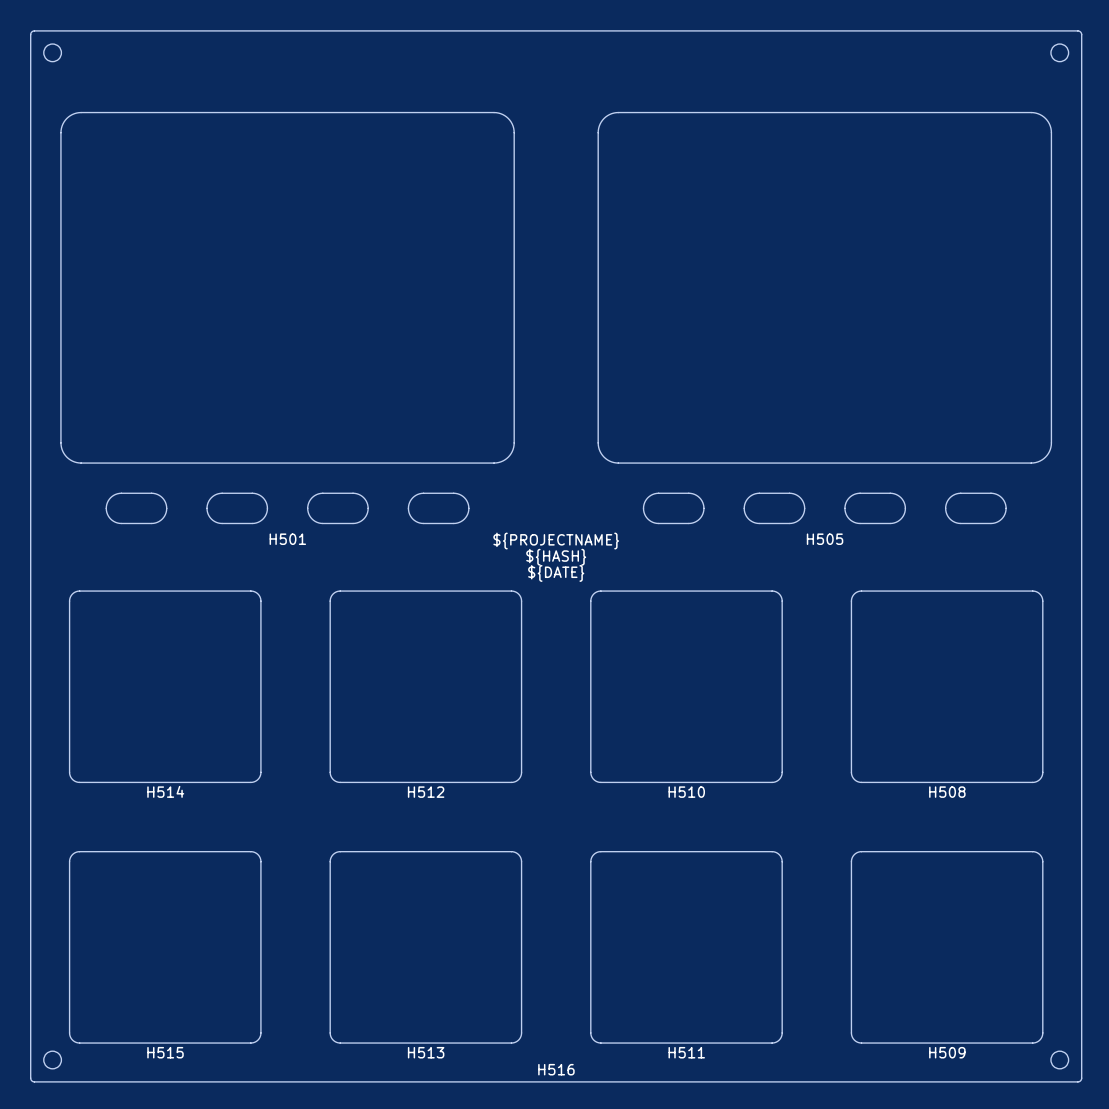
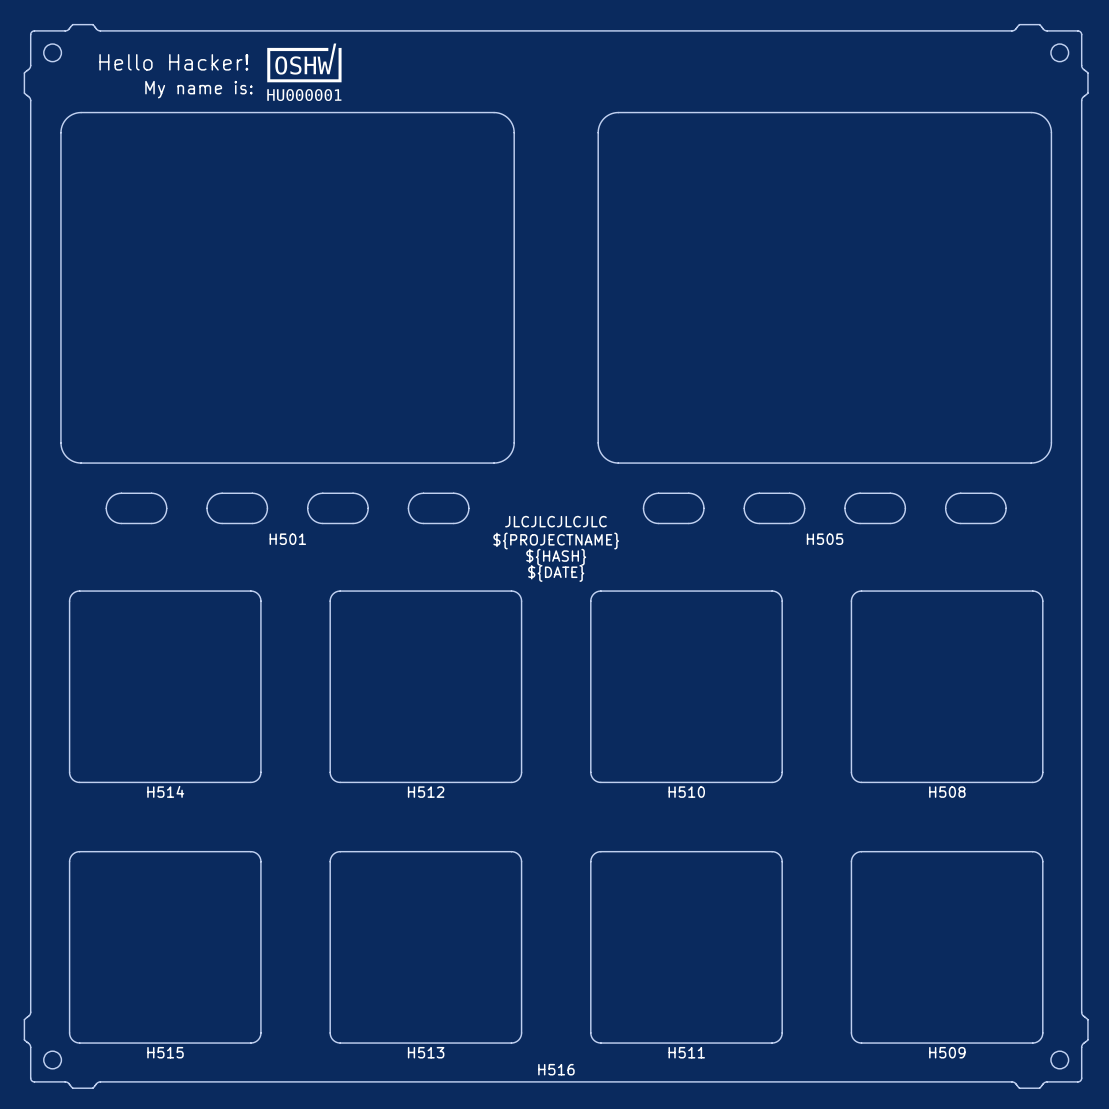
H516 footprint: [30, 30, 1082, 1083] -> [24, 24, 1089, 1089]
drawing: none -> [267, 43, 342, 102]
text: none -> Hello Hacker! (173, 62)
text: none -> My name is: (198, 89)
text: none -> JLCJLCJLCJLC (555, 521)

